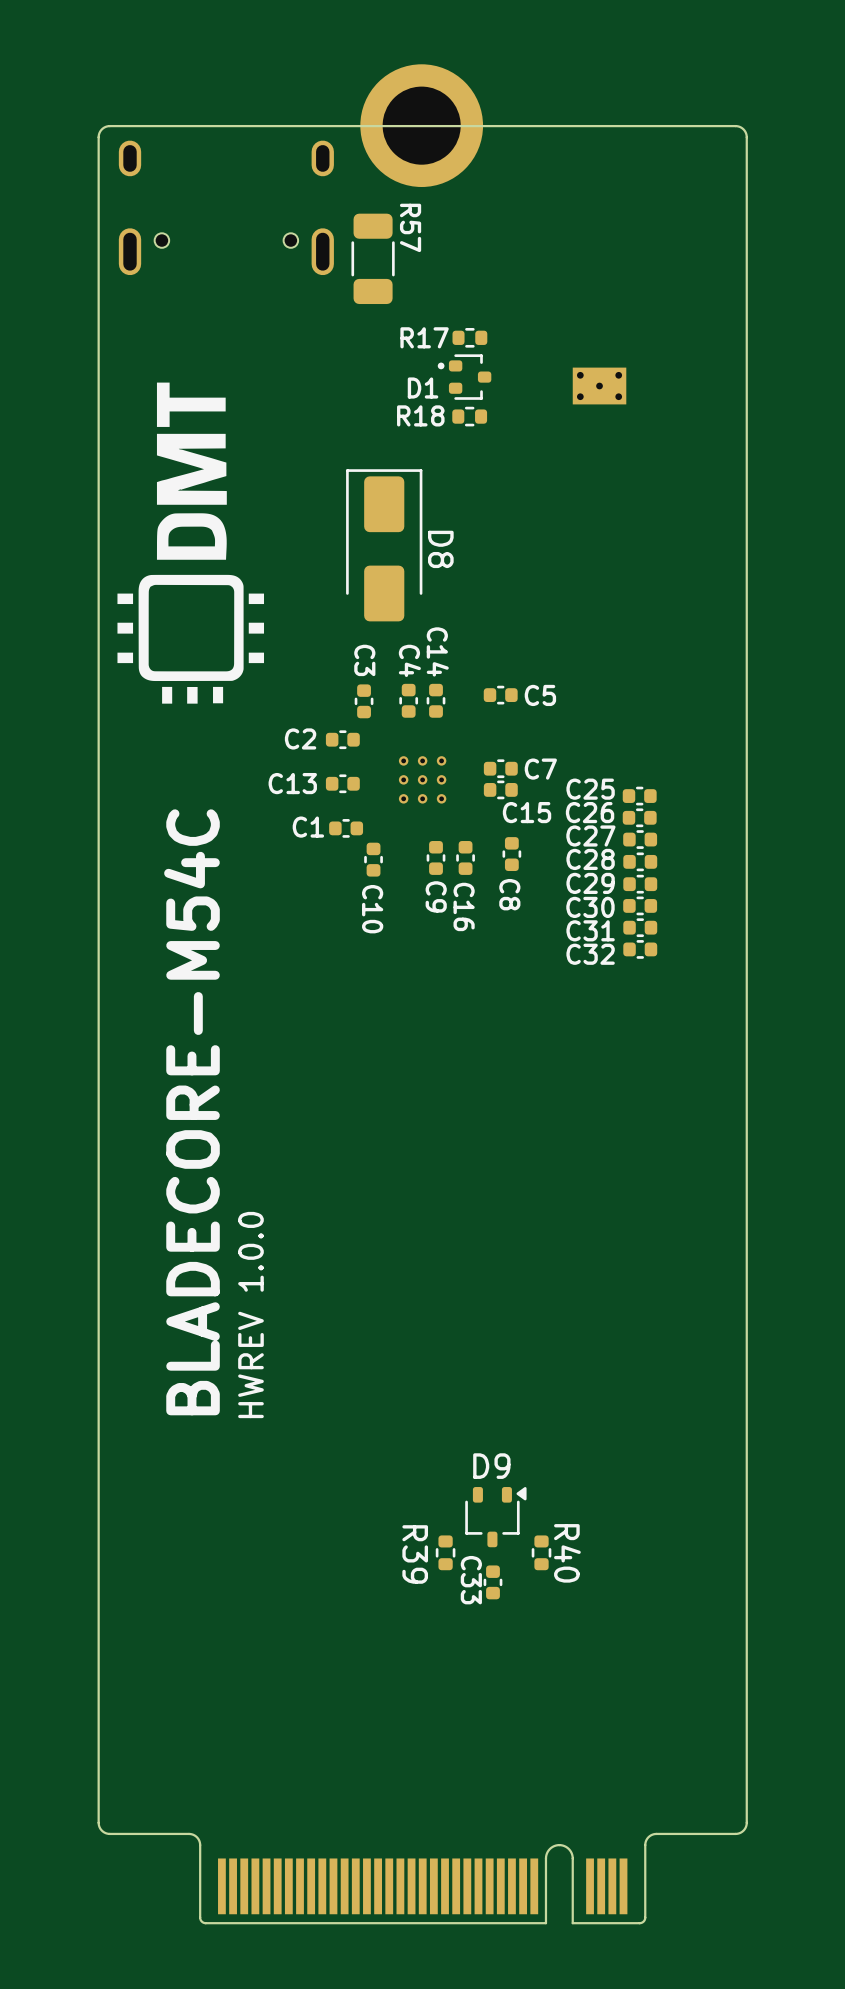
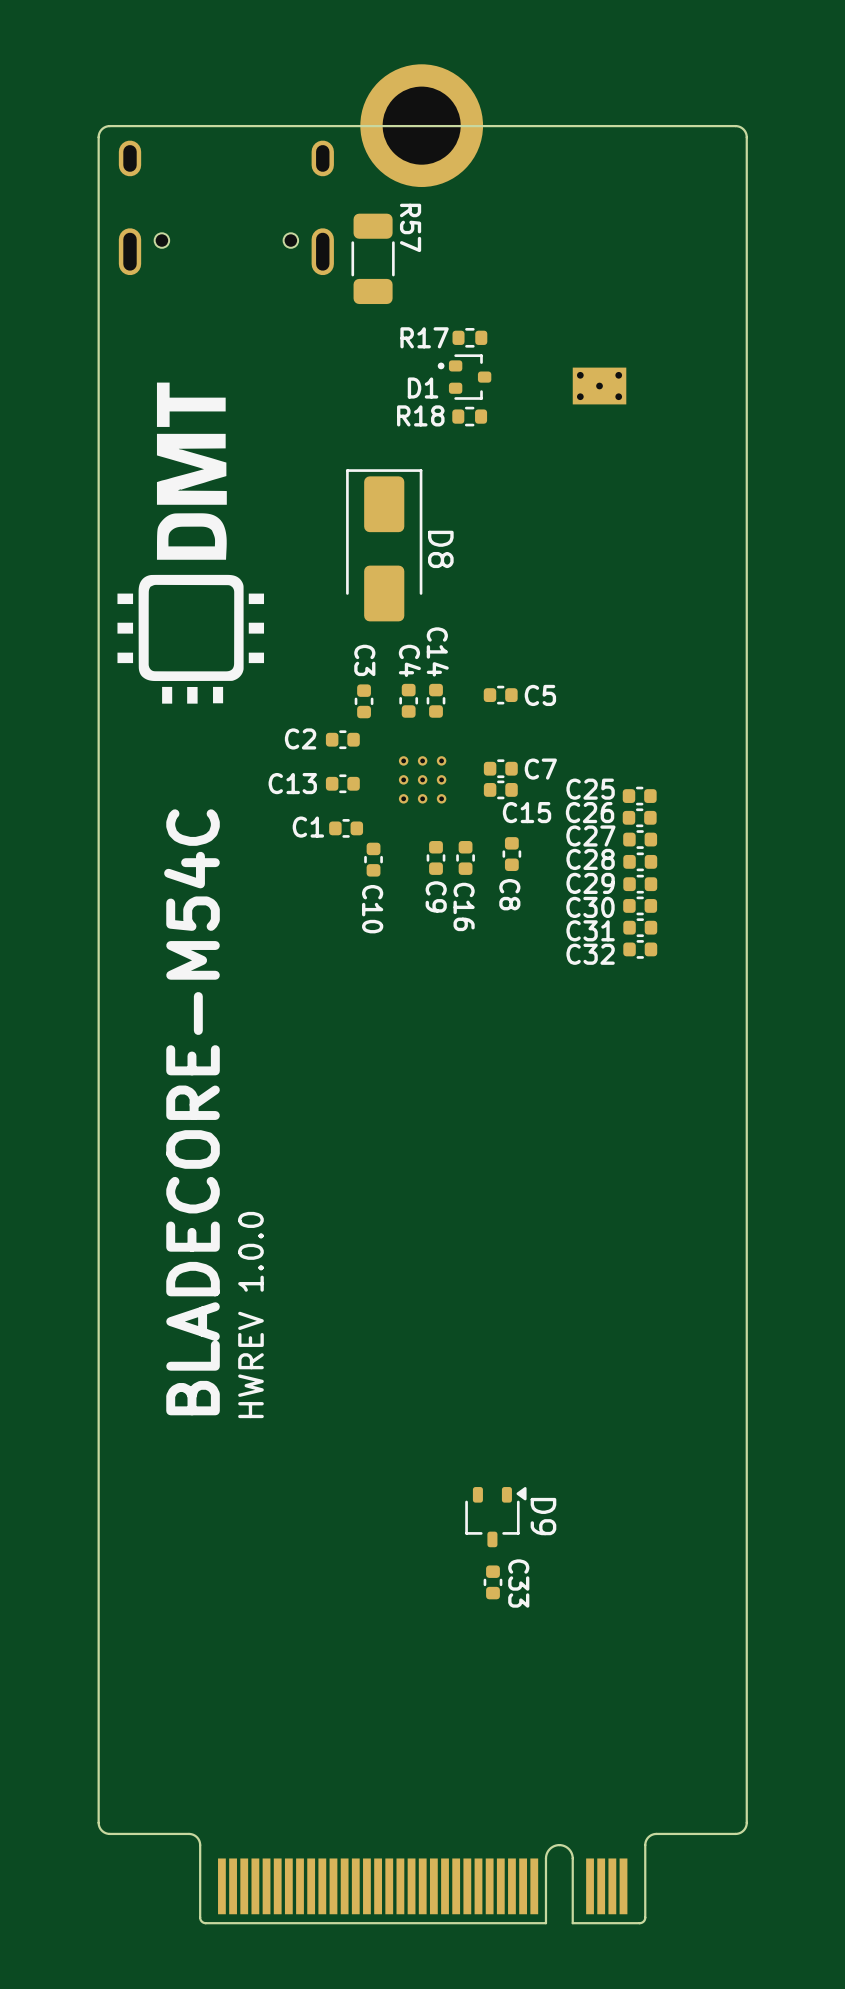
D9 name rotation: 0° (491, 1466) -> 90° clockwise (543, 1516)
D9 name position: D9 (491, 1466) -> D9 (543, 1516)
R39: (445, 1552) -> none
R40: (541, 1552) -> none
C33 name position: C33 (471, 1580) -> C33 (518, 1583)

